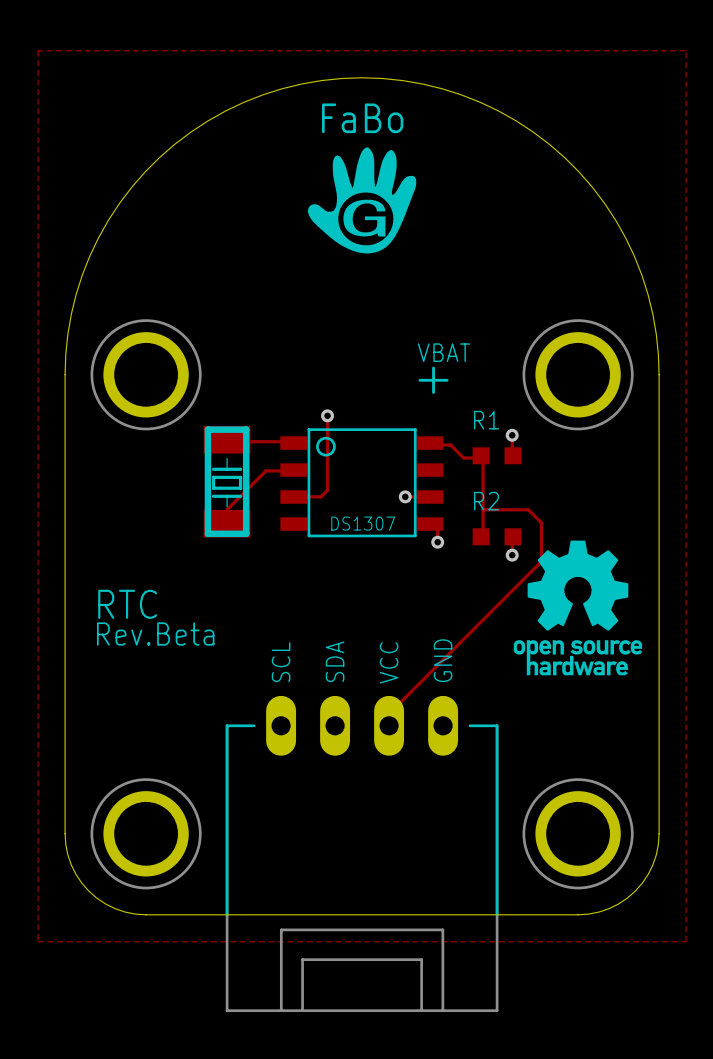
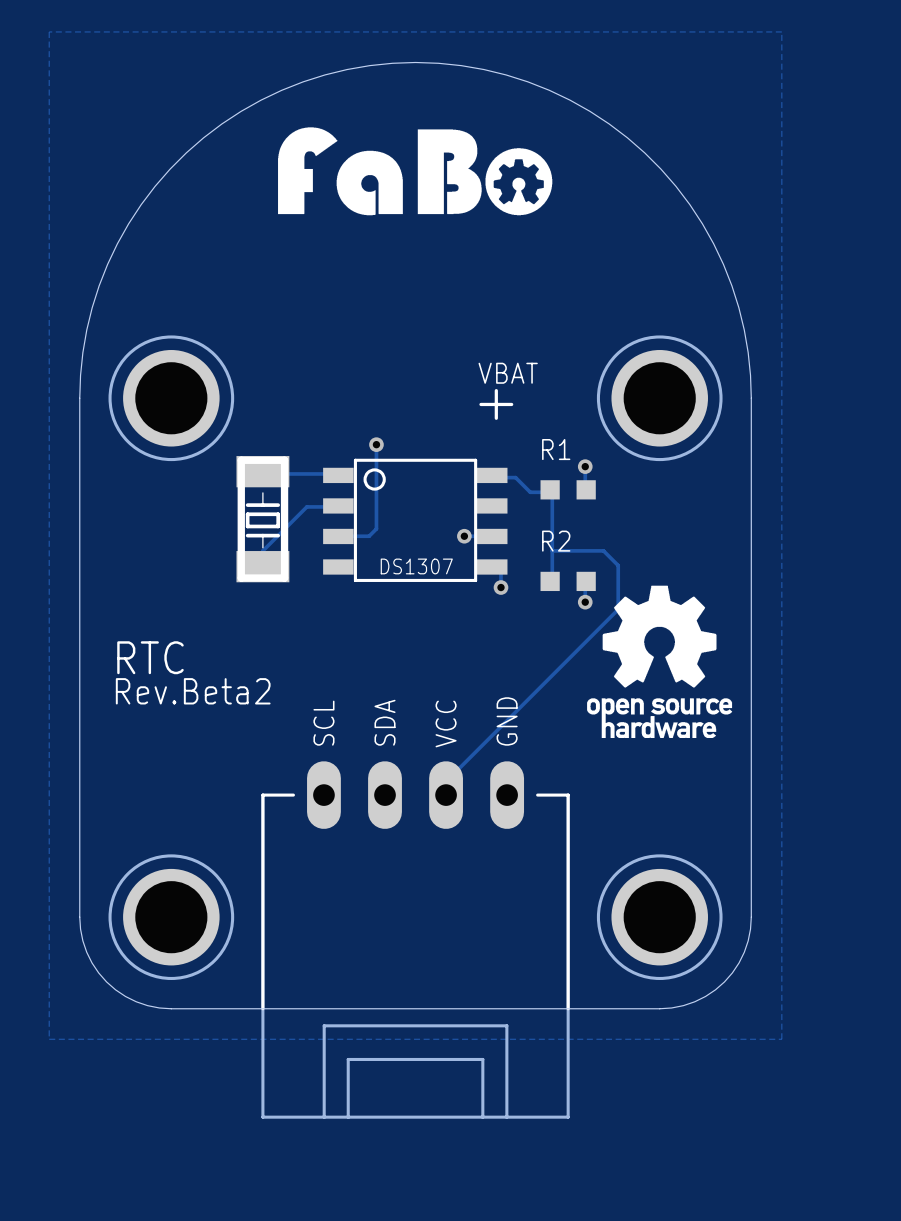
drawing: none -> [278, 127, 553, 216]
drawing: [307, 147, 417, 254] -> none
text: Rev.Beta (155, 634) -> Rev.Beta2 (193, 691)

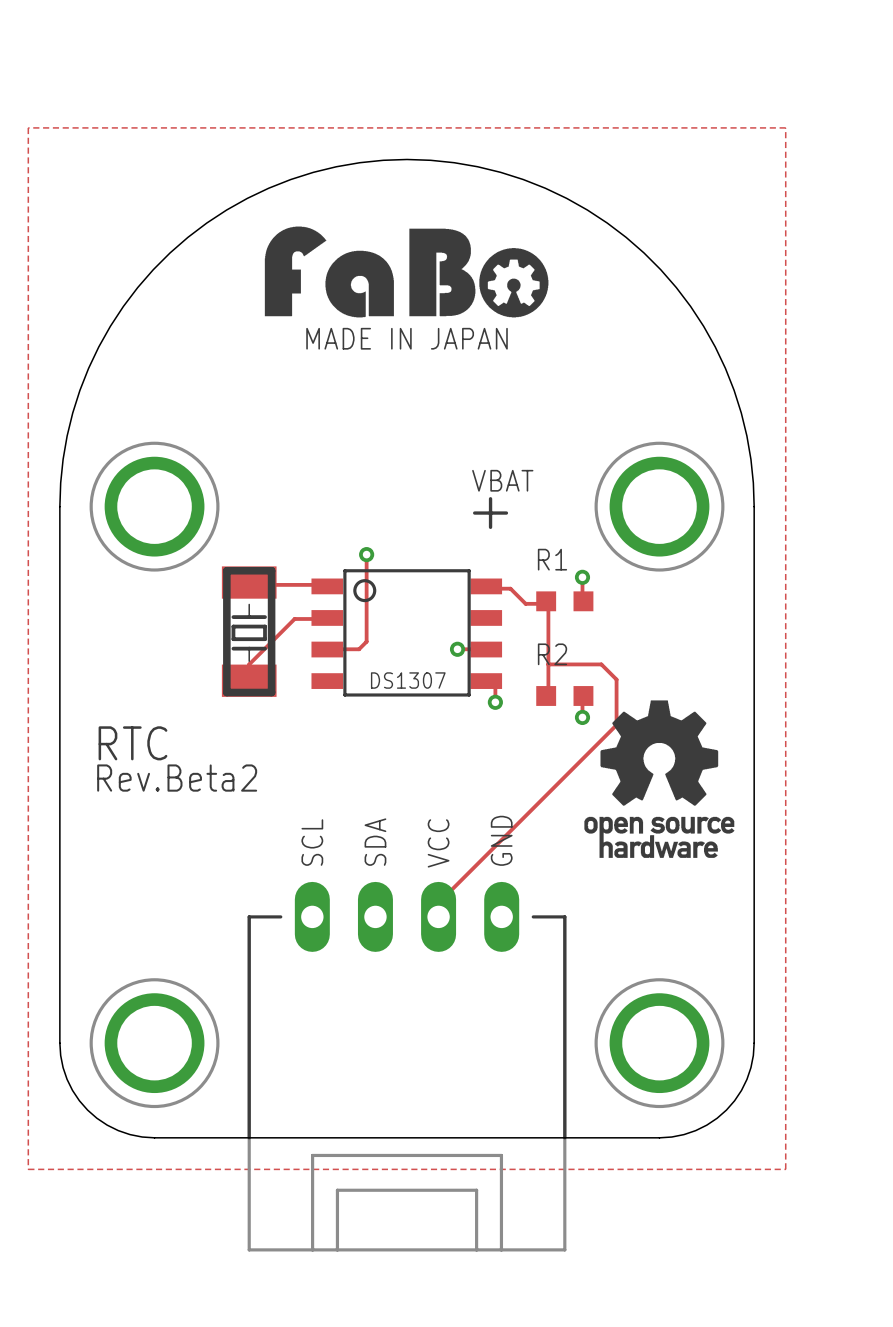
text: none -> MADE IN JAPAN (407, 338)
text: none -> RTC (132, 743)
text: RTC (150, 657) -> Rev.Beta2 (177, 778)
text: Rev.Beta2 (193, 691) -> none

